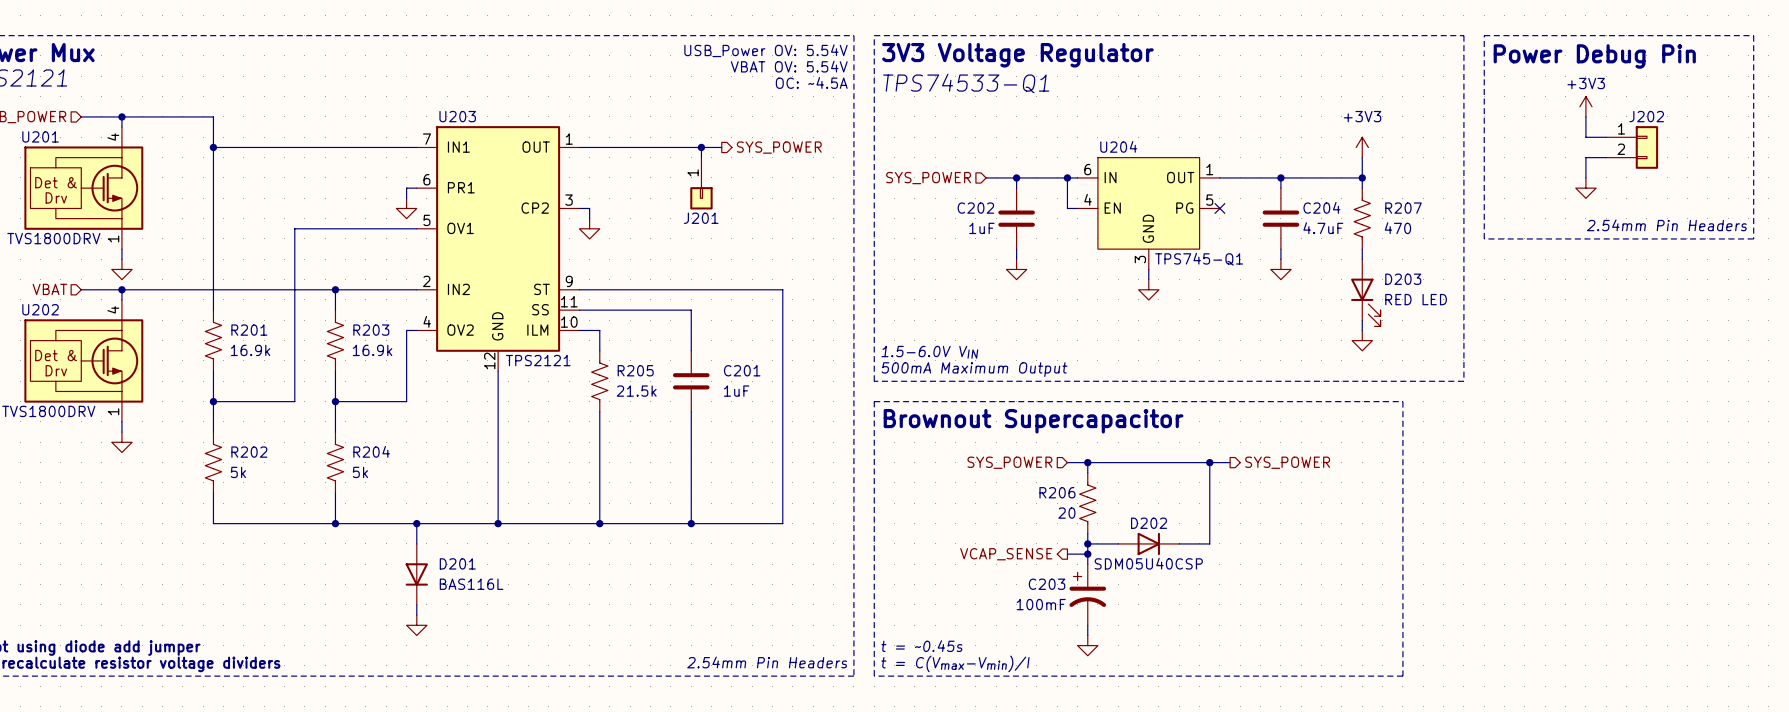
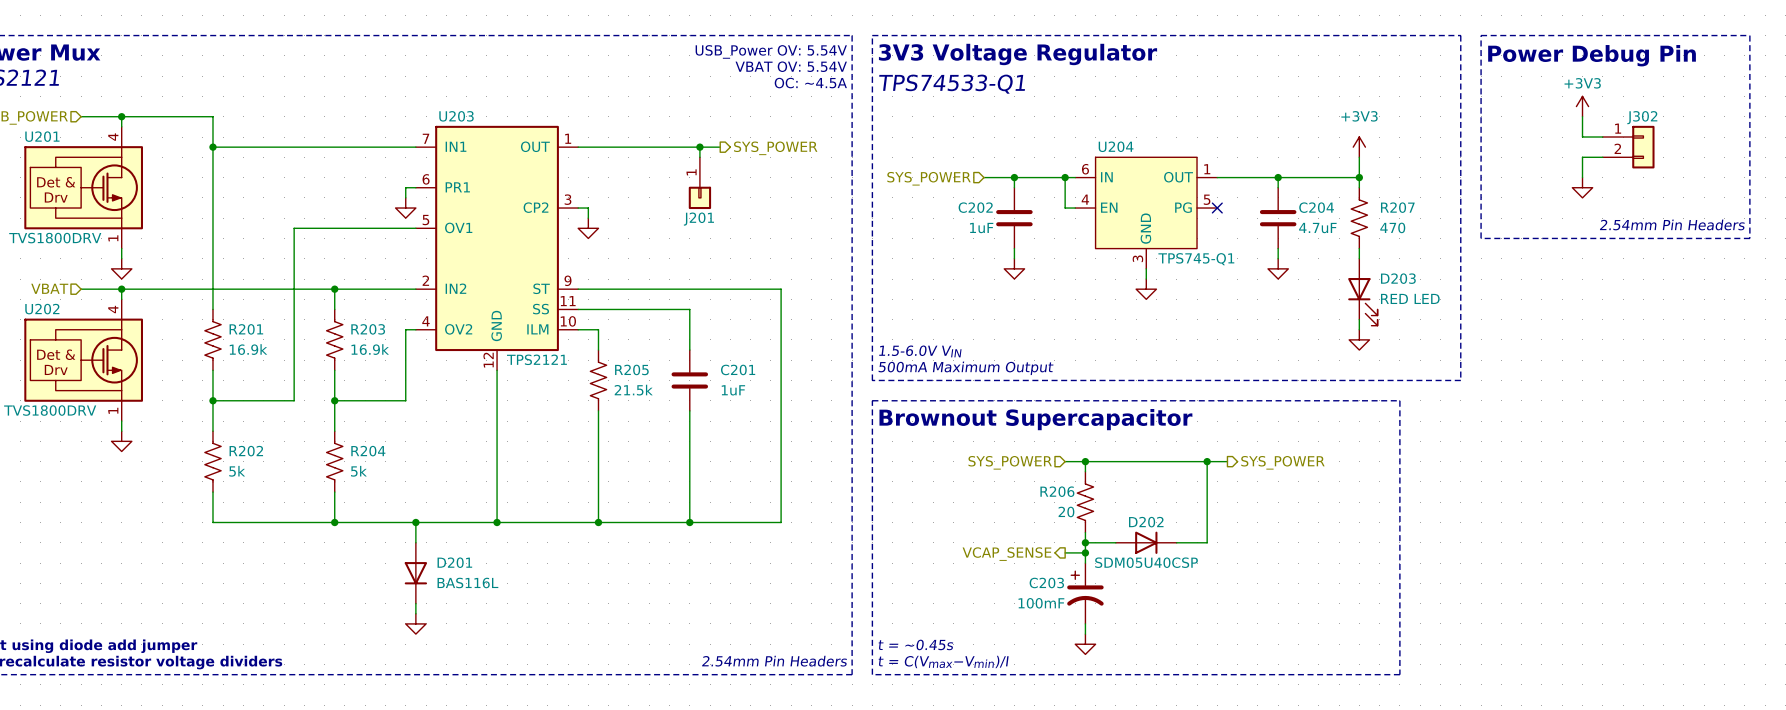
J202 name: J202 (1646, 116) -> J302 (1642, 117)

